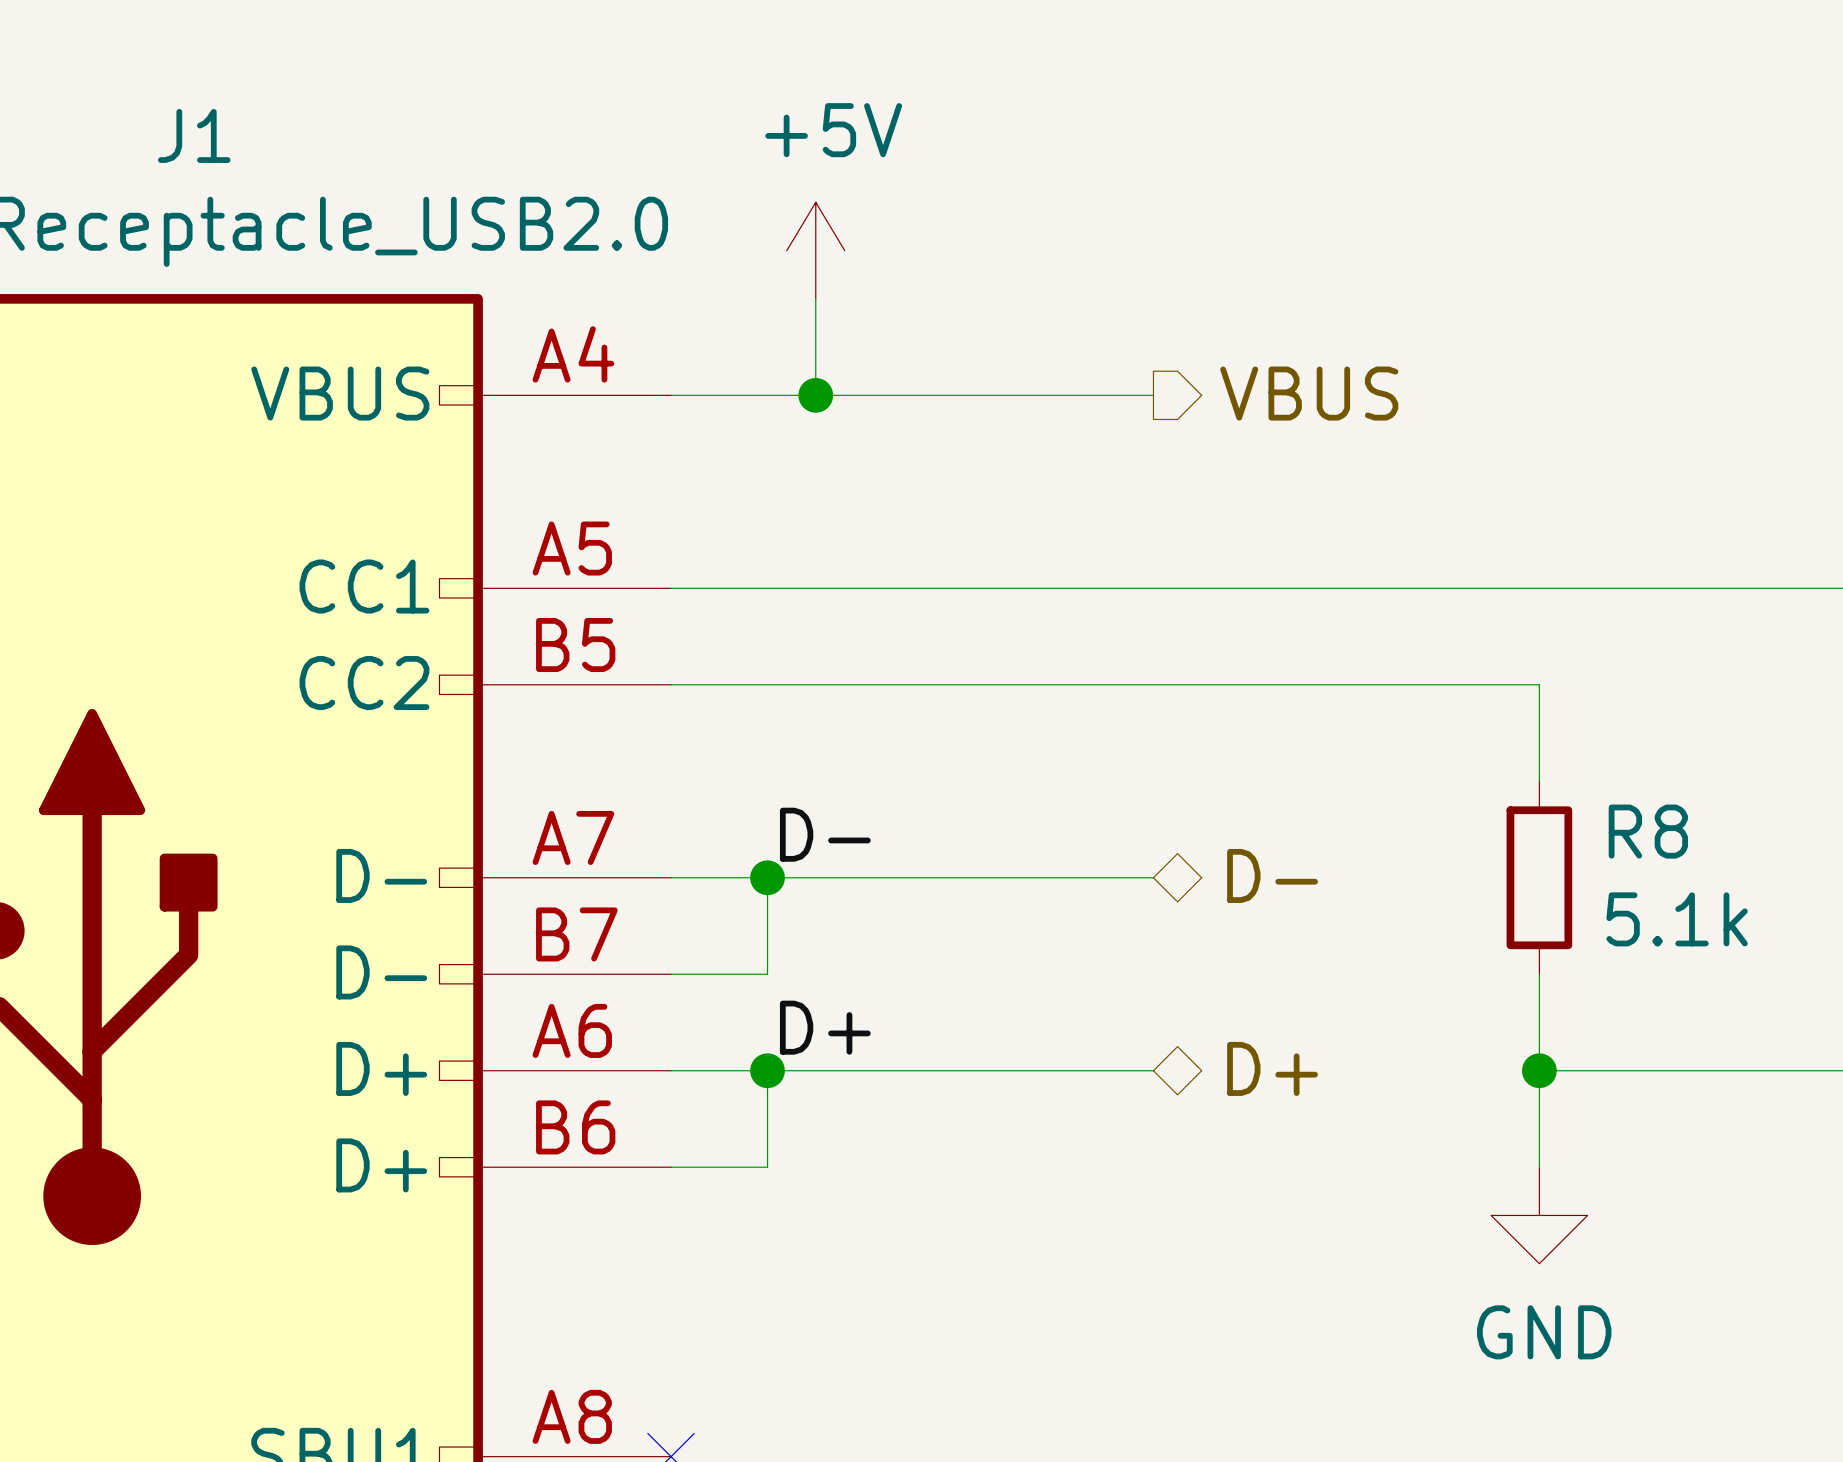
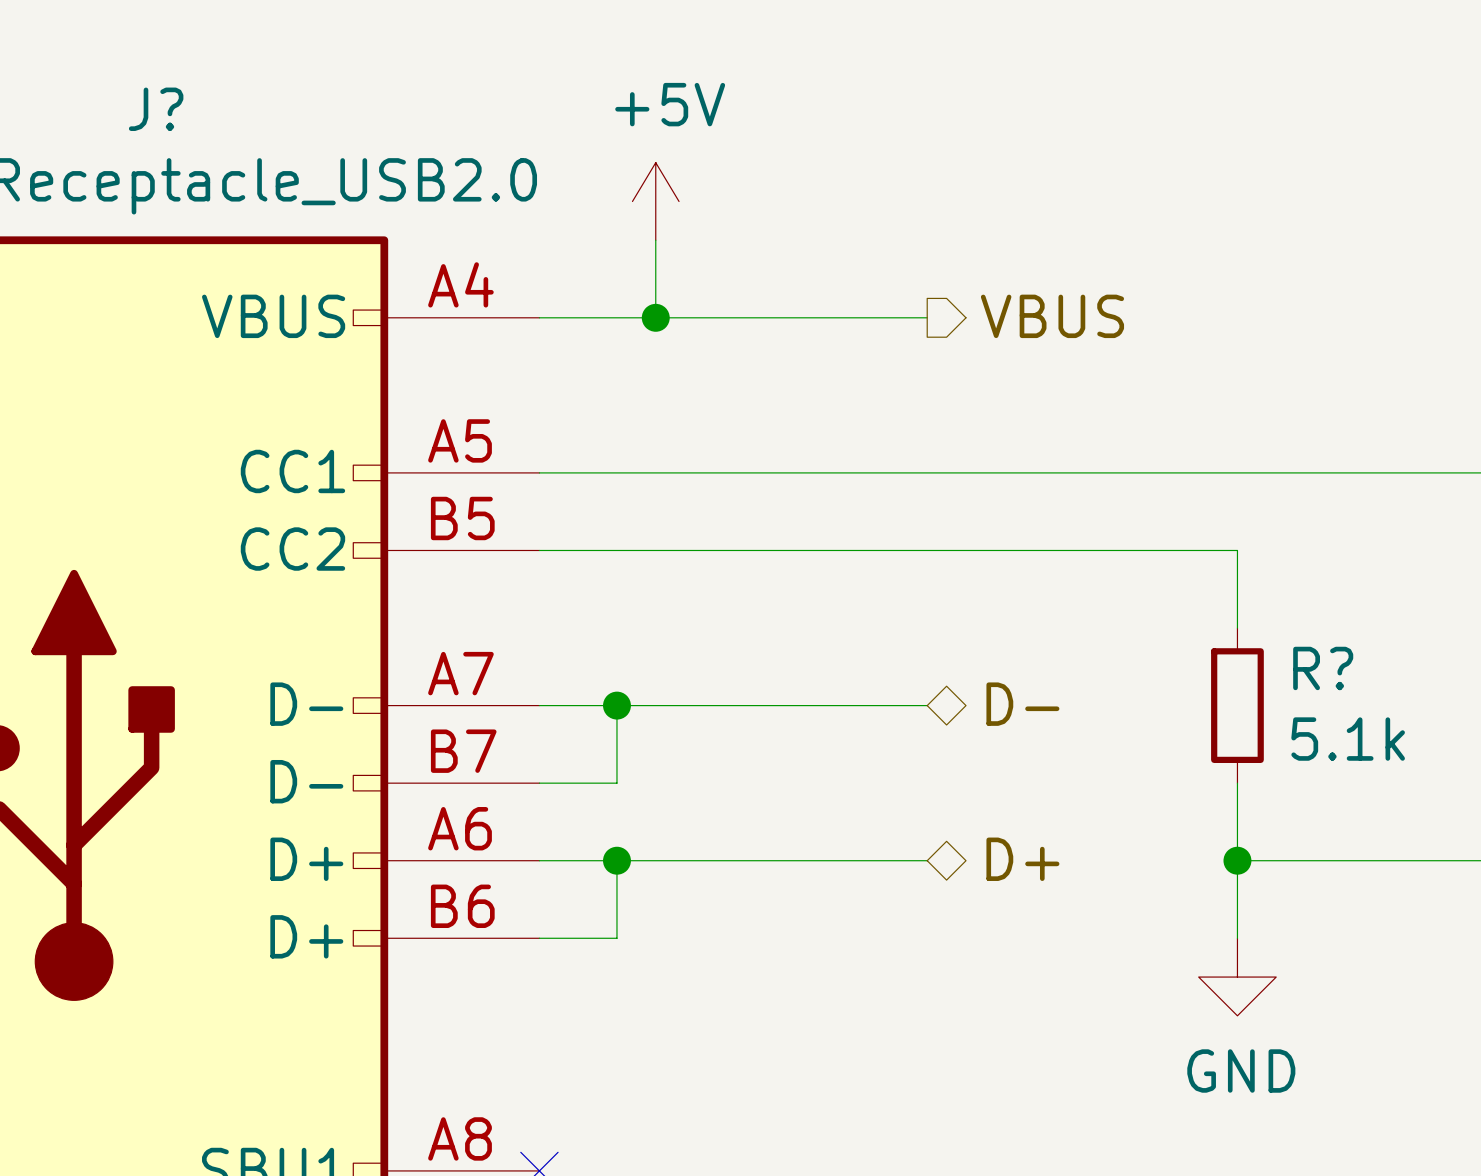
J1 name: J1 (194, 135) -> J? (156, 109)
R8 name: R8 (1648, 831) -> R? (1323, 668)
label: D- (825, 834) -> none
label: D+ (825, 1027) -> none

